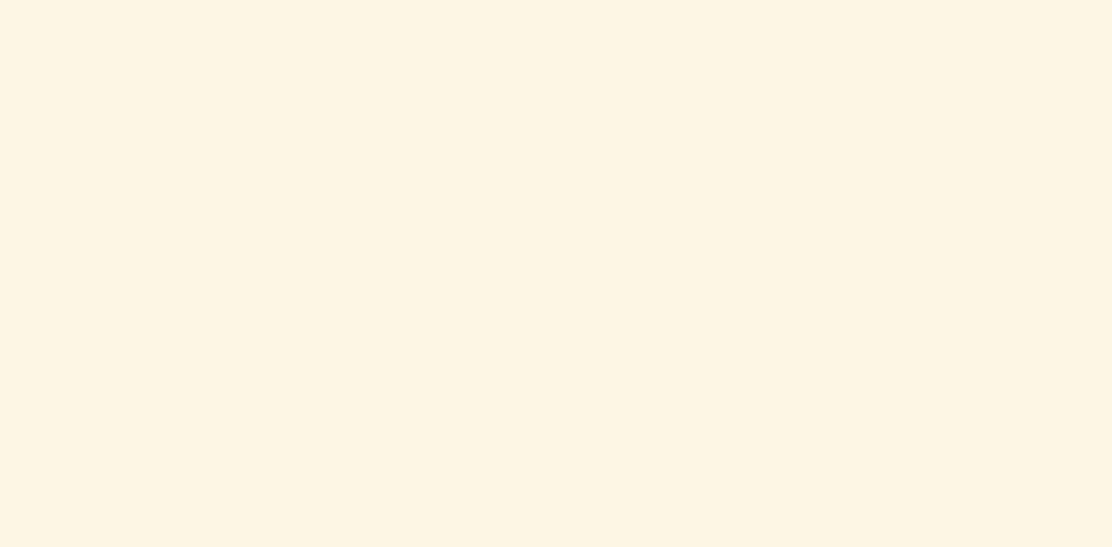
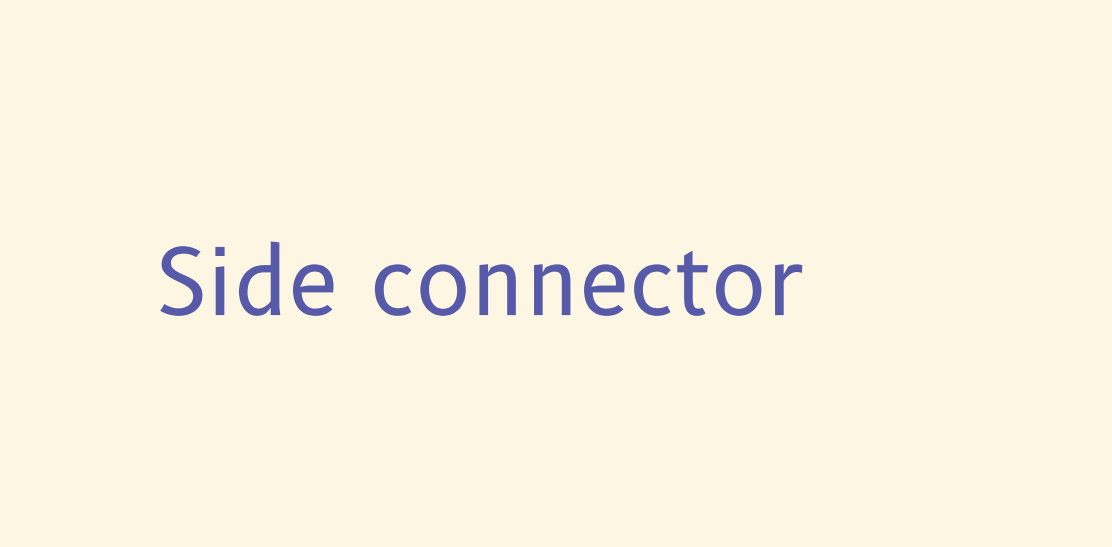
text: none -> Side connector (481, 278)

